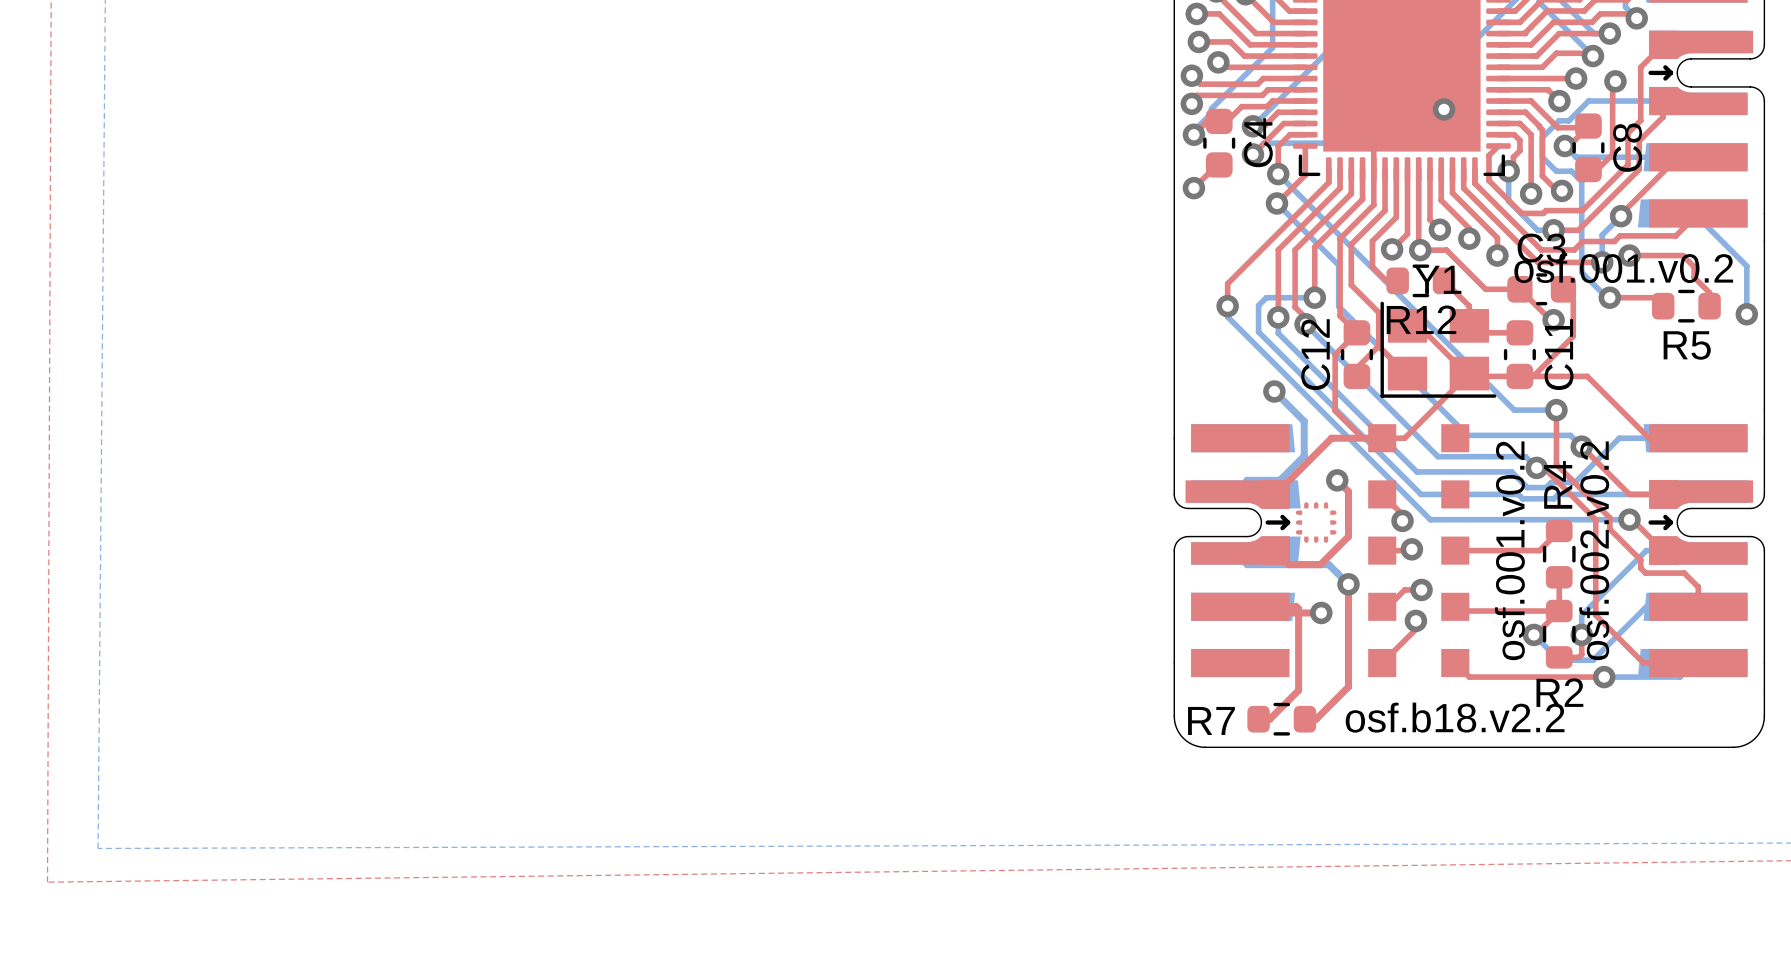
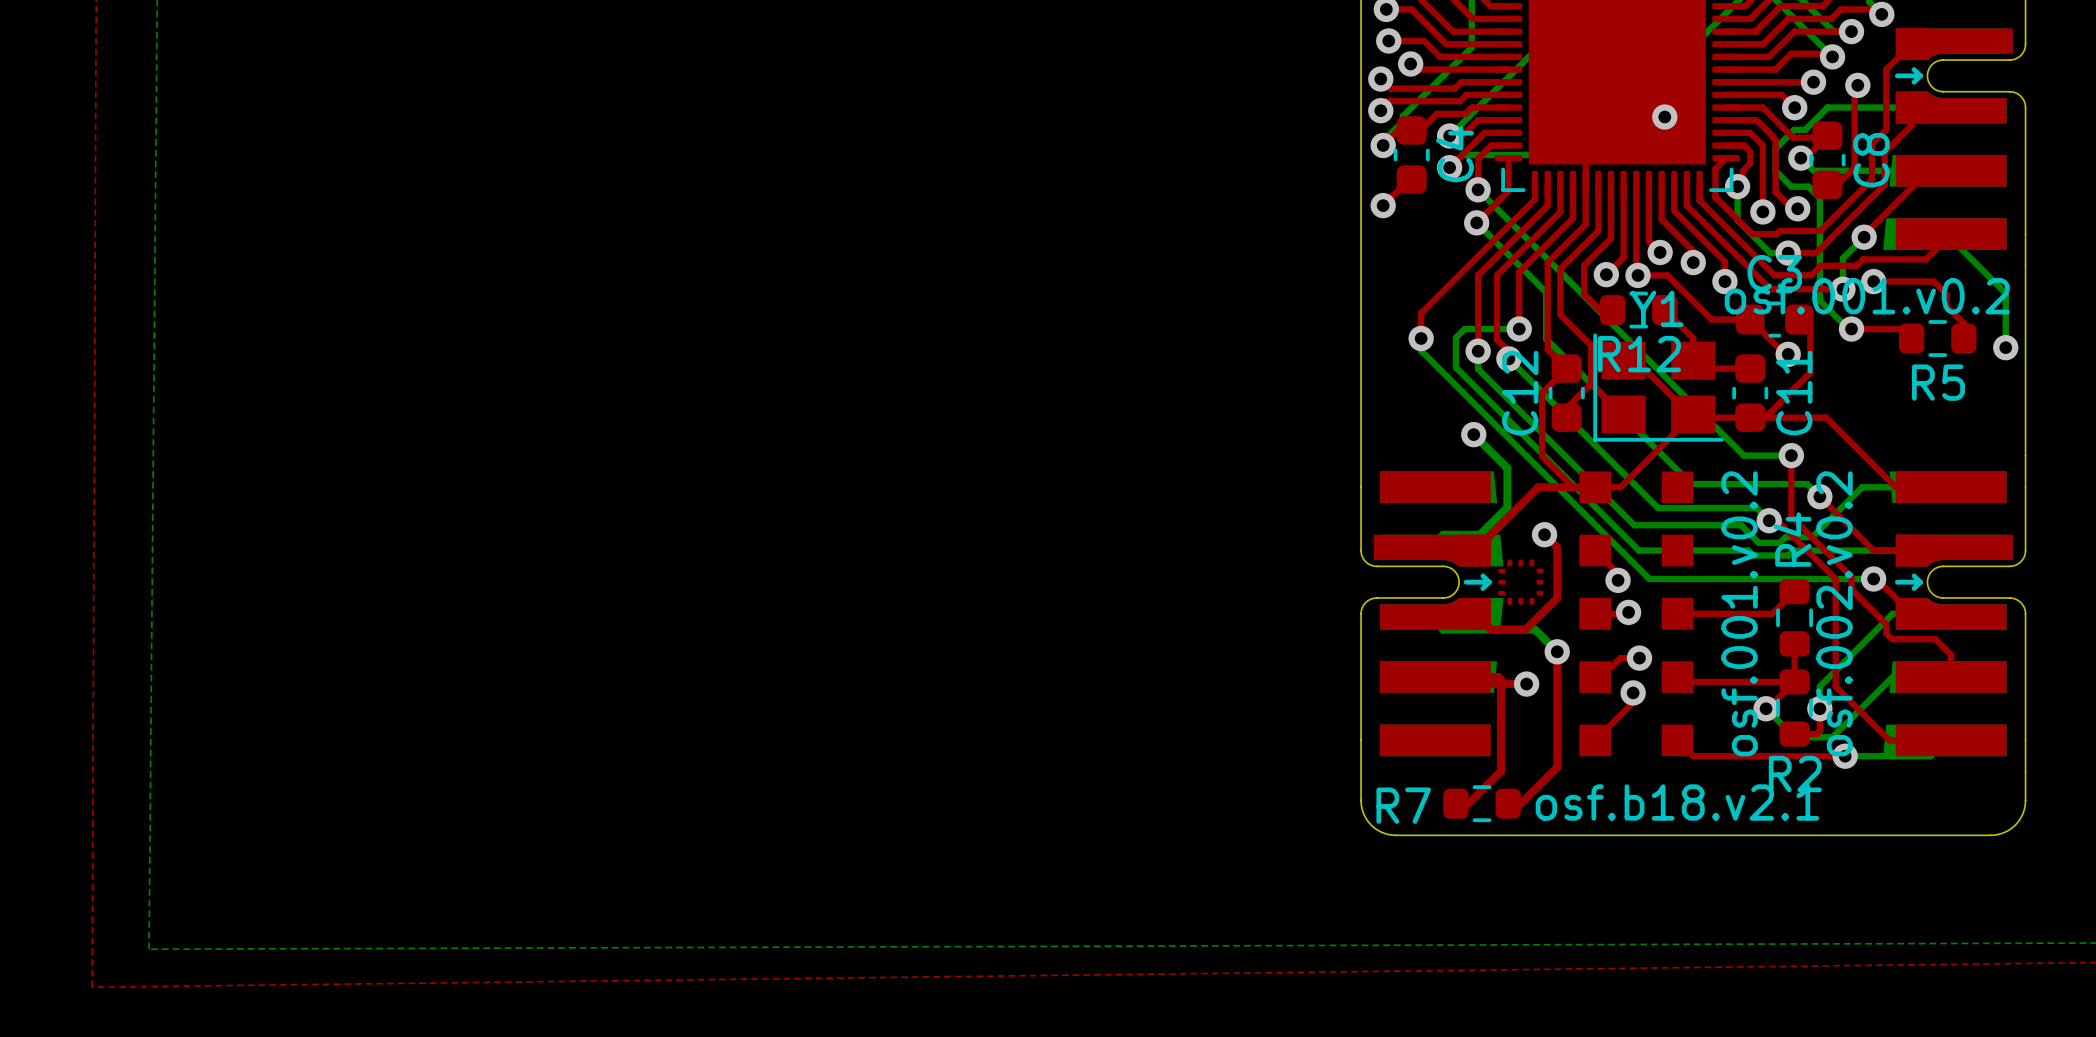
text: osf.b18.v2.2 (1455, 717) -> osf.b18.v2.1 (1677, 802)

